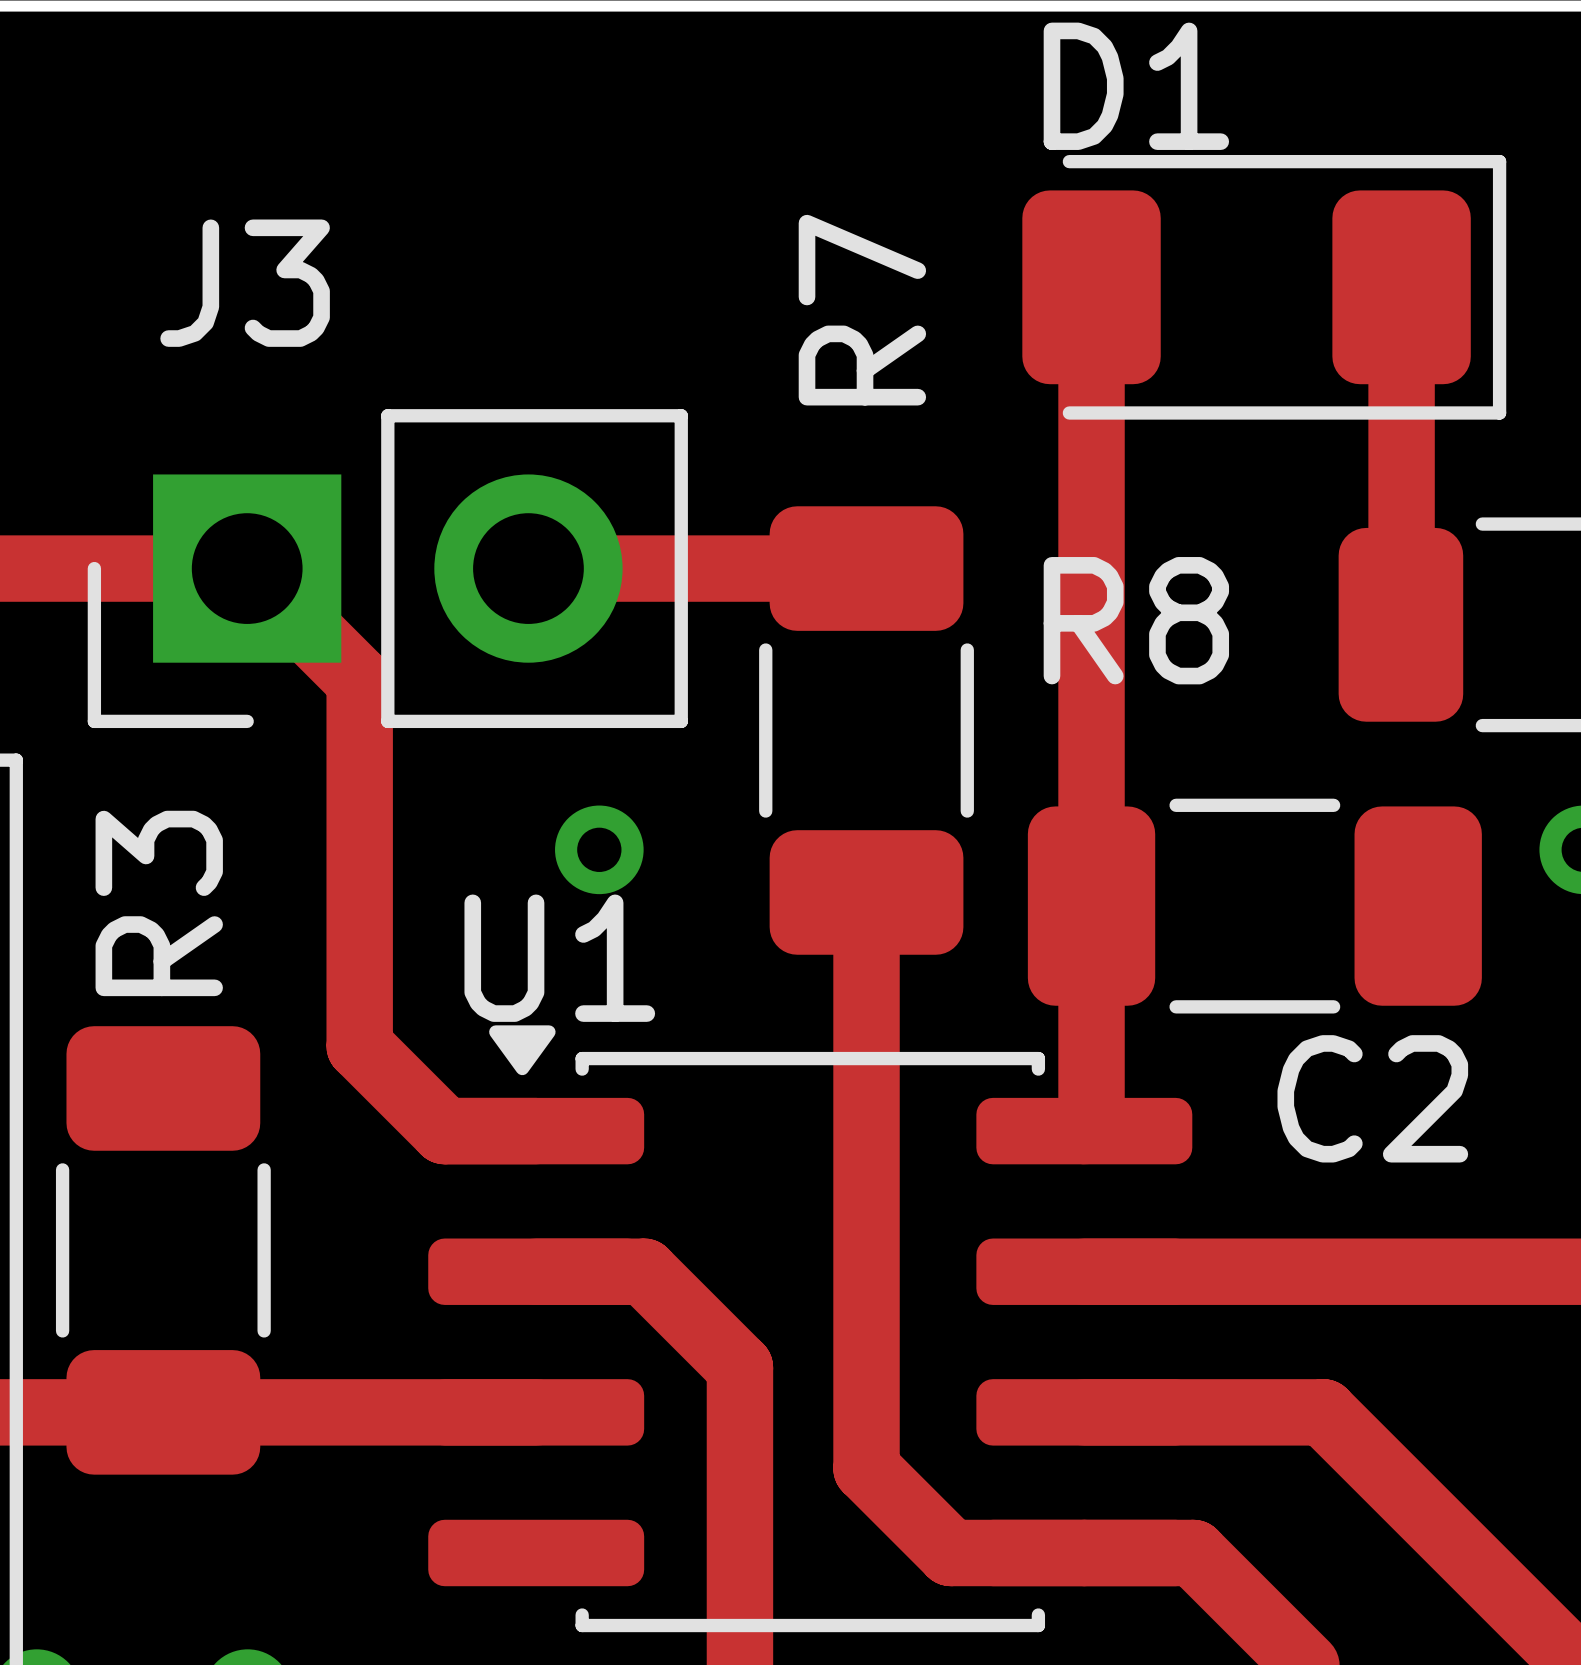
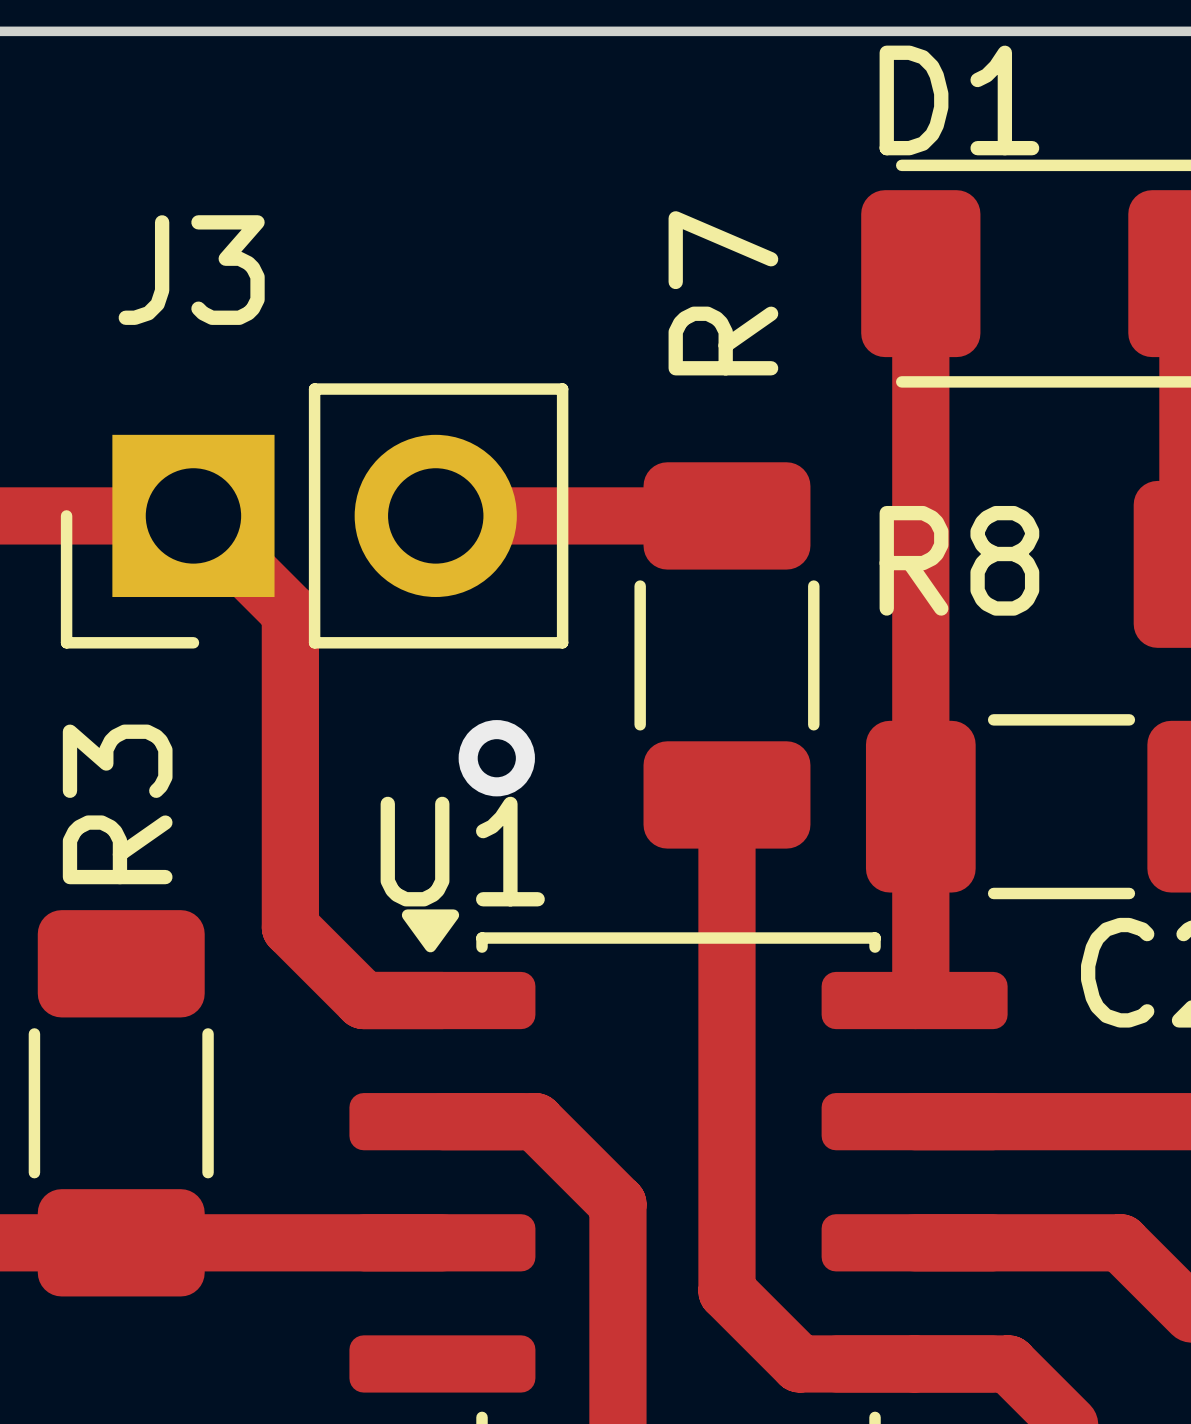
J3 footprint: [87, 409, 688, 729] -> [60, 383, 569, 649]

